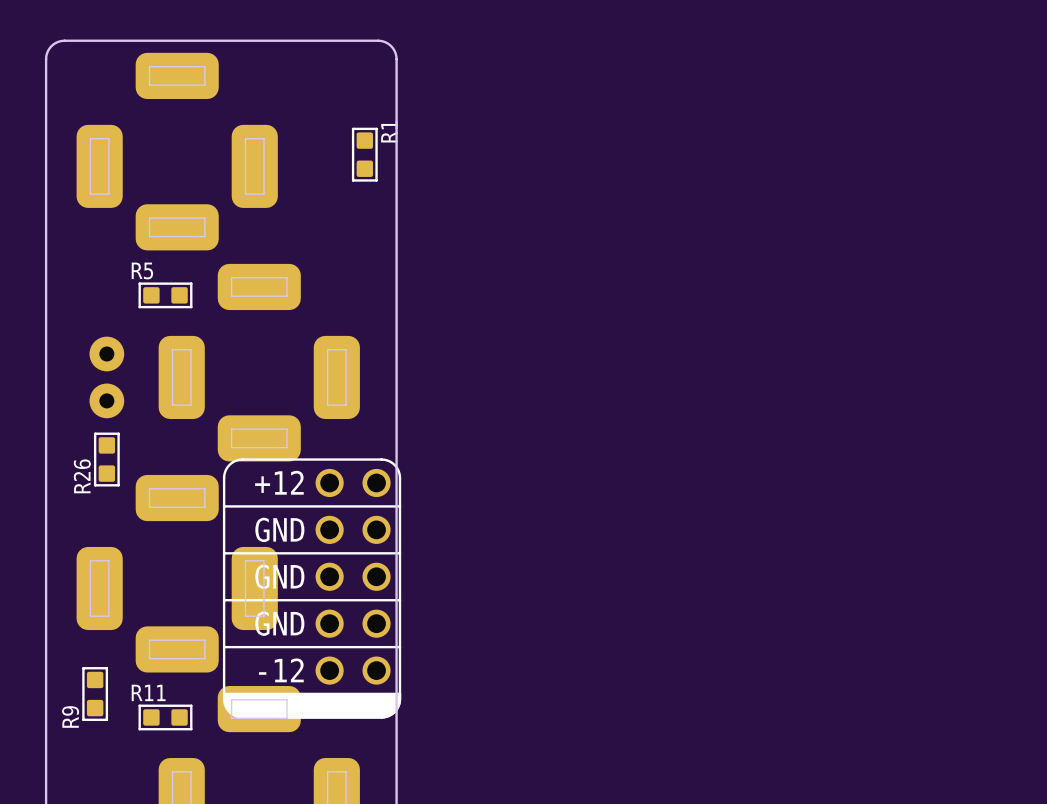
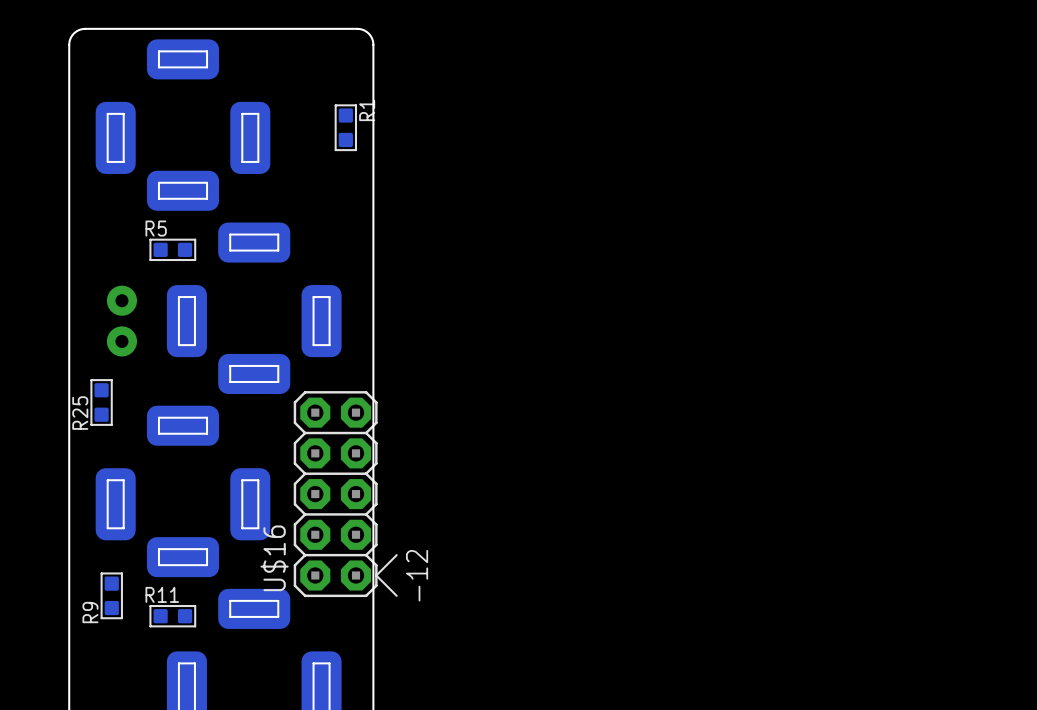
R26: (106, 459) -> none
R25: none -> (101, 402)
U$16: none -> (345, 494)
part: (312, 588) -> none

